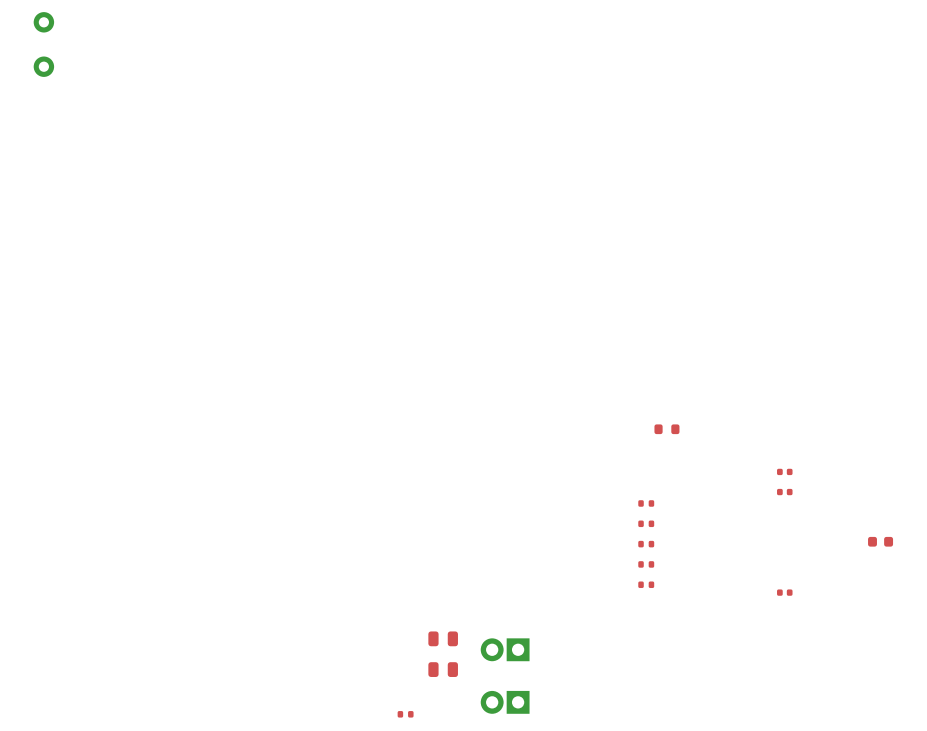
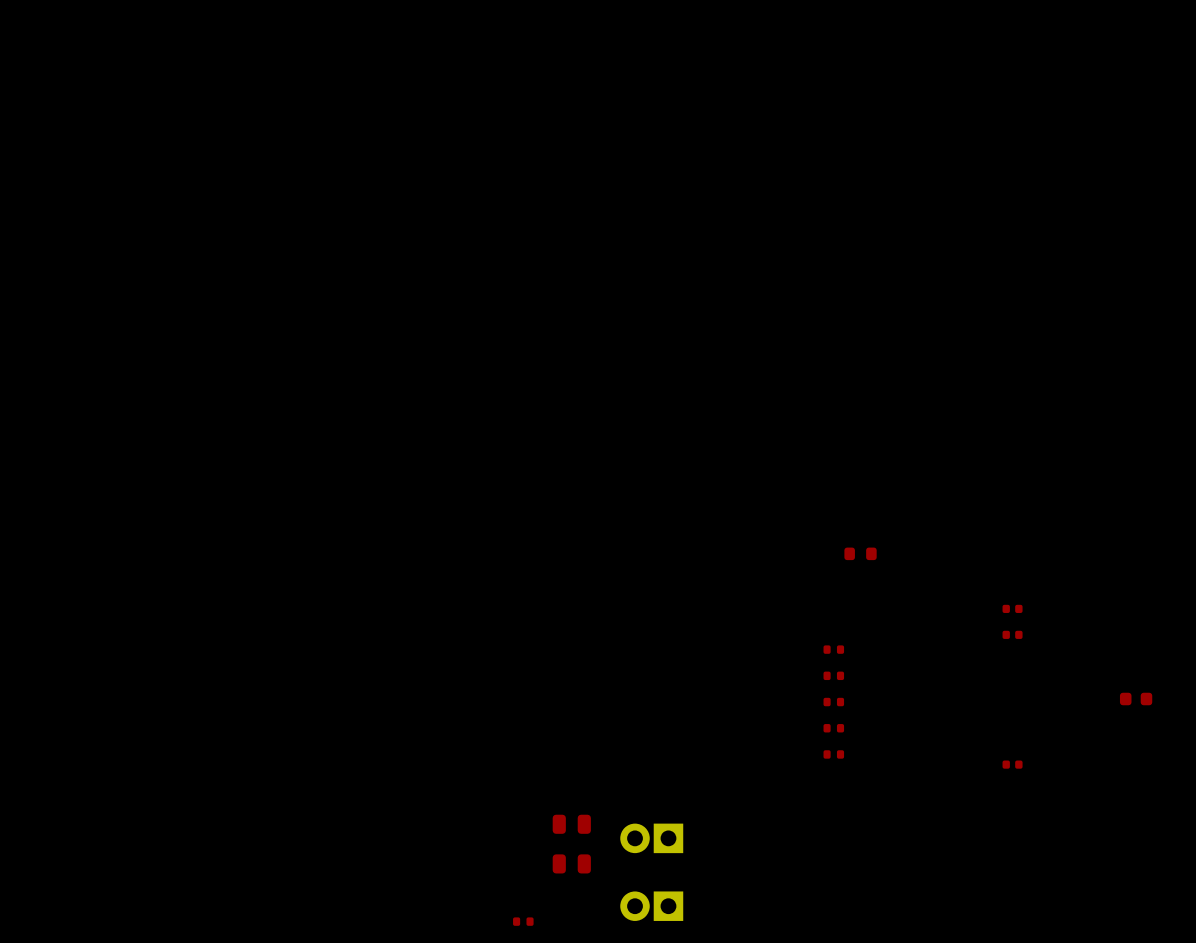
part: (43, 22) -> none
part: (43, 66) -> none

